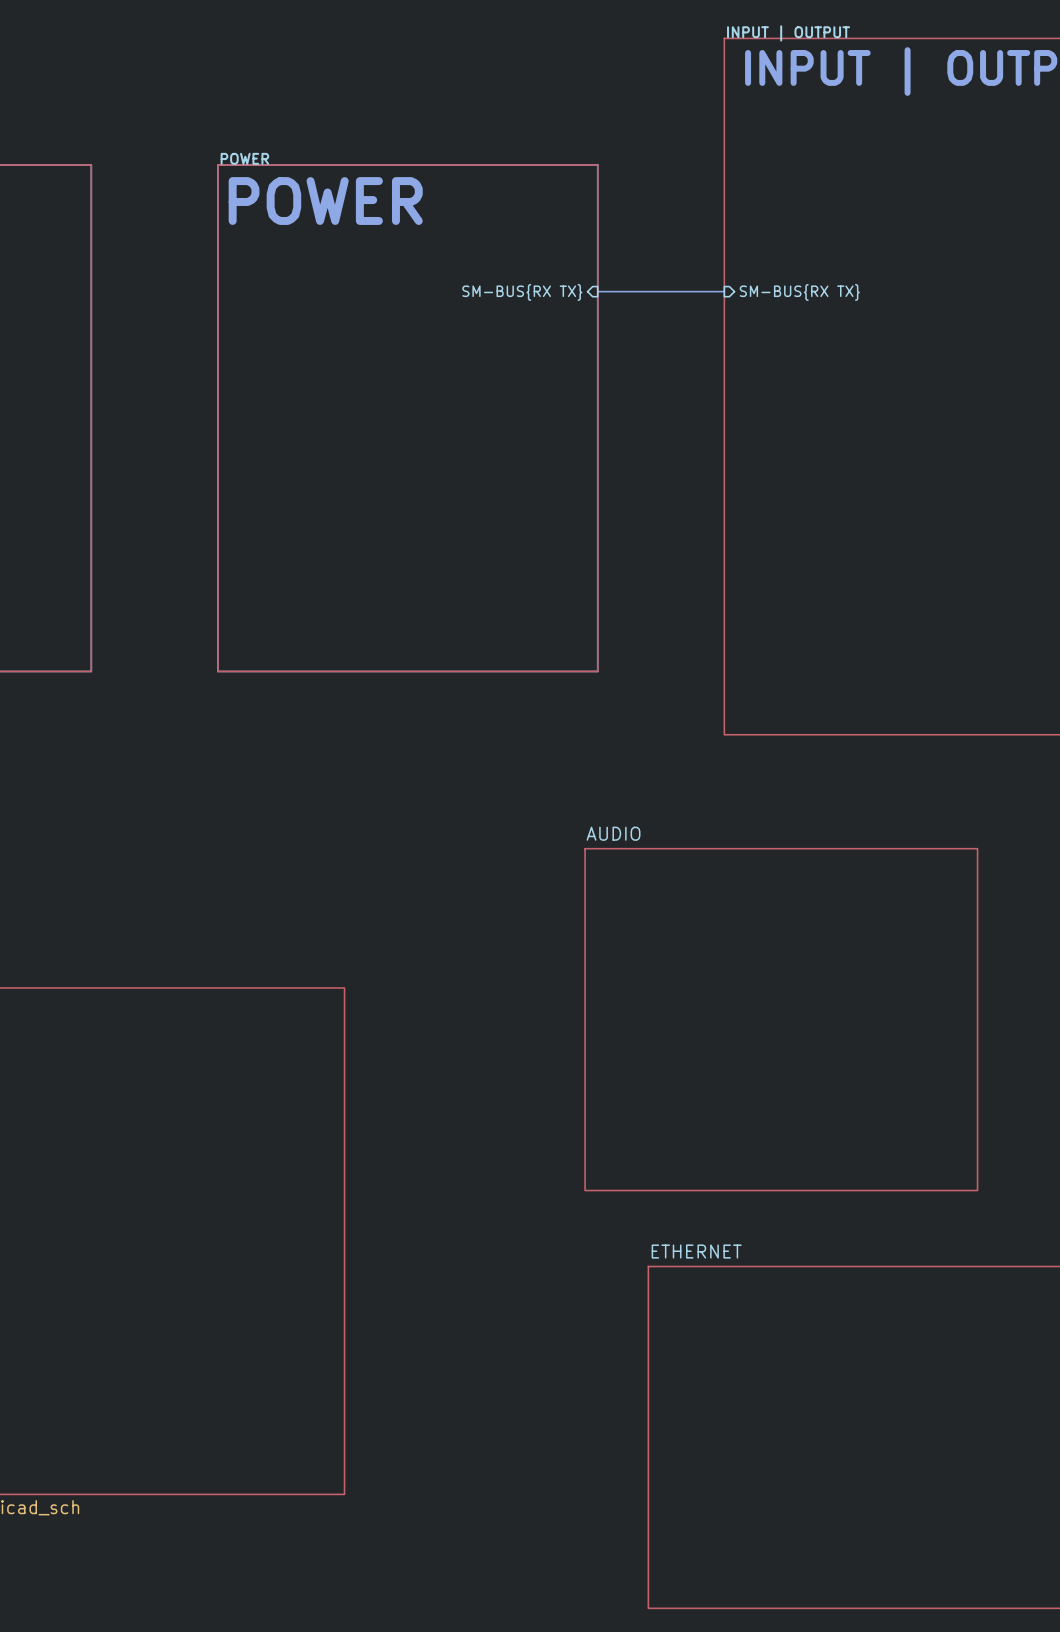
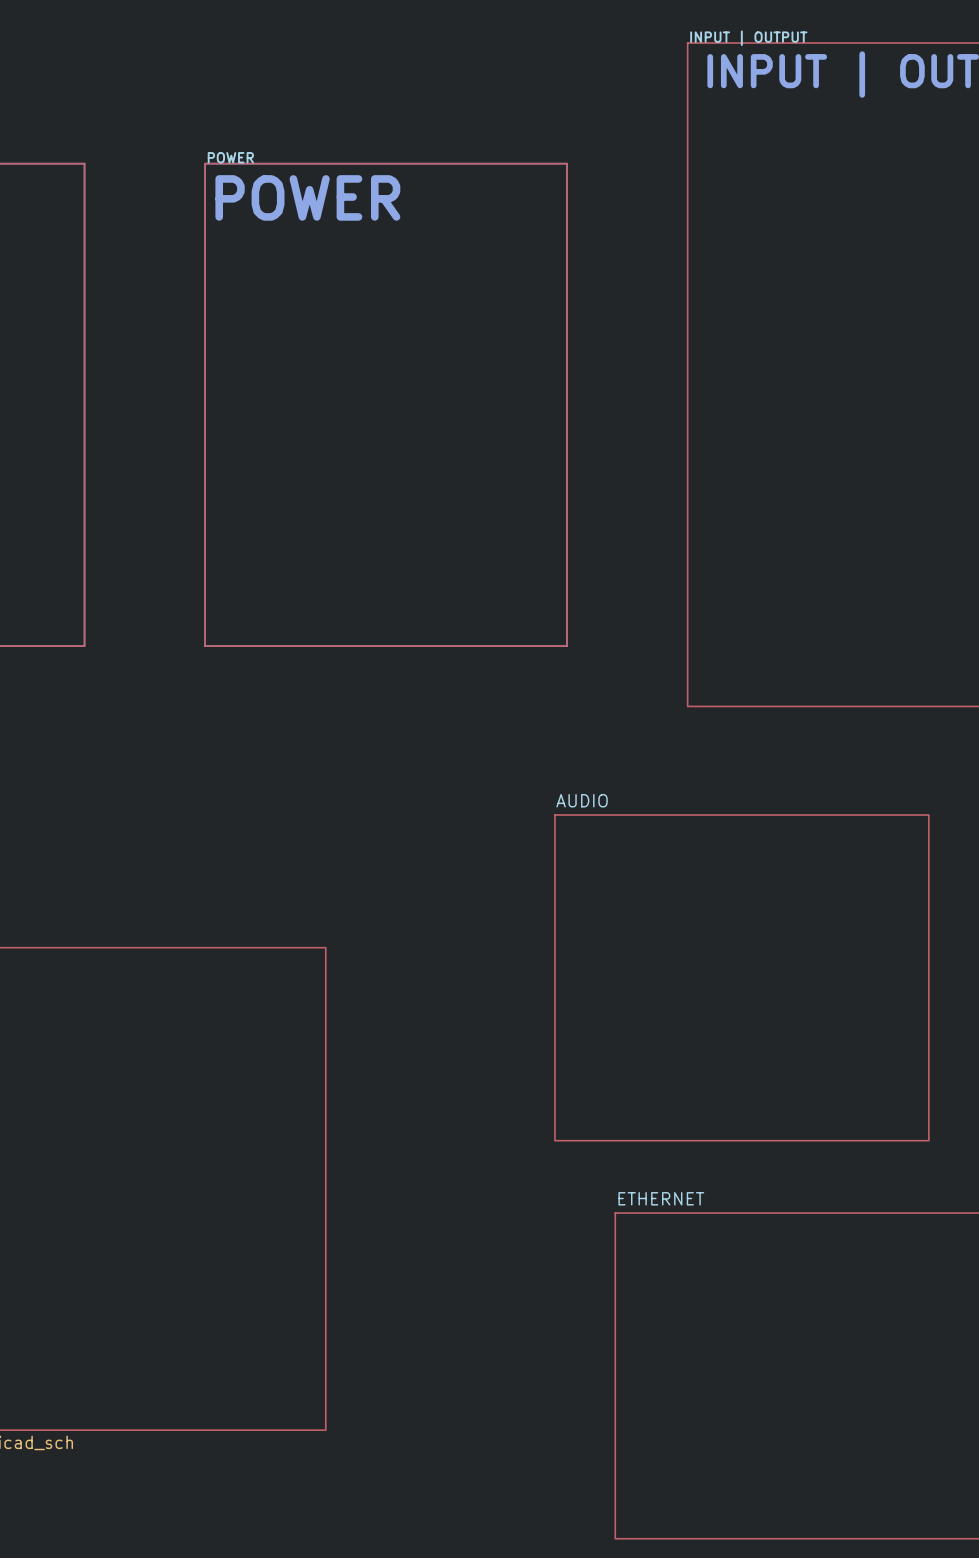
bus: (597, 291) (724, 291) -> none
sheet pin: SM-BUS{RX TX} (522, 292) -> none
sheet pin: SM-BUS{RX TX} (799, 292) -> none

